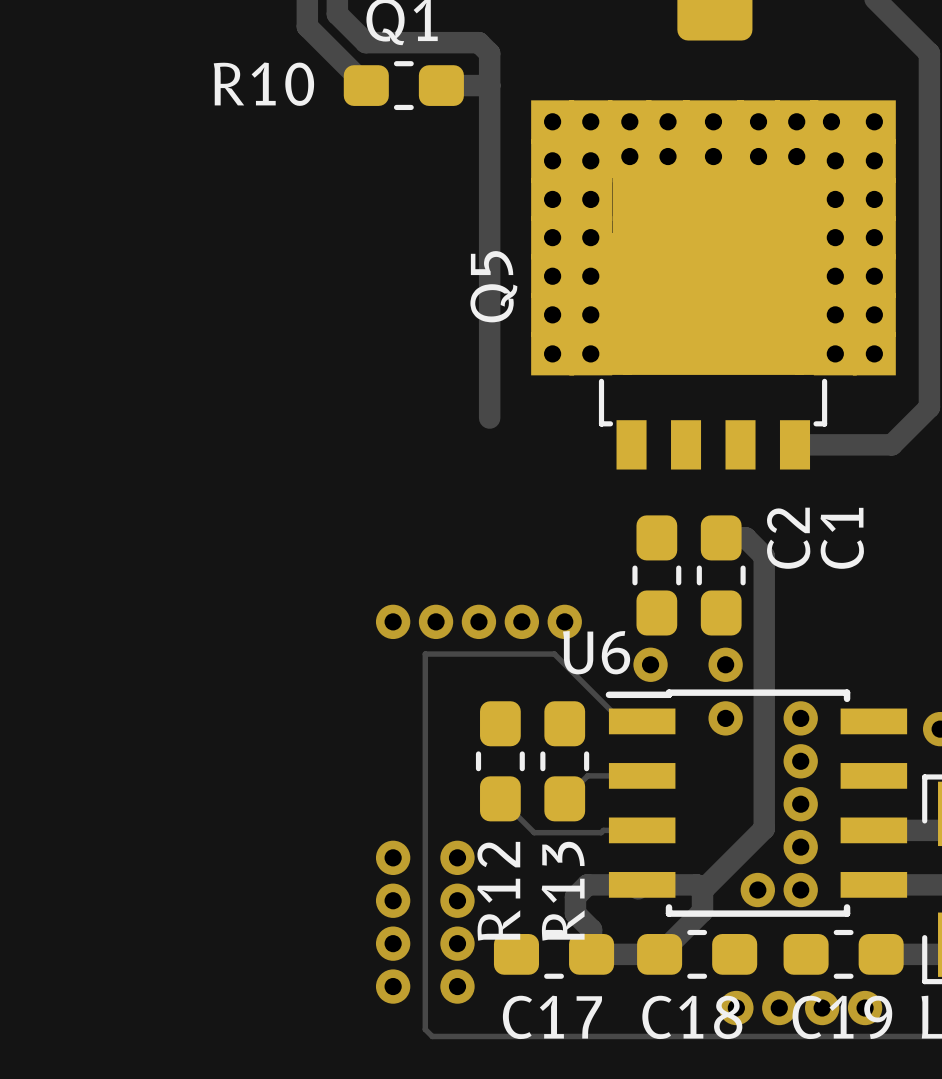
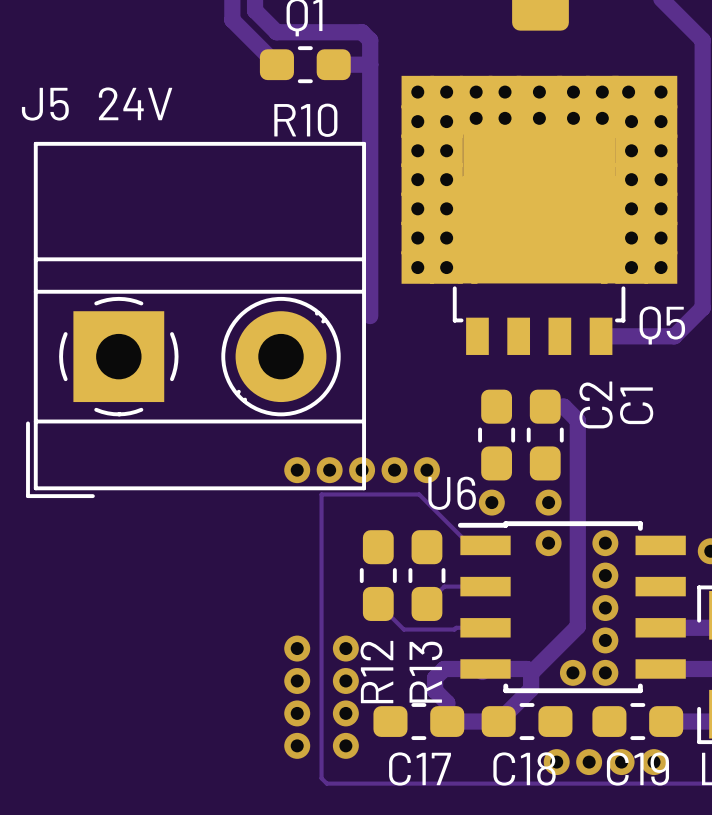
R10 name position: R10 (263, 84) -> R10 (305, 120)
text: none -> 24V (135, 103)
Q5 name rotation: 0° (493, 286) -> 90° clockwise (662, 325)
Q5 name position: Q5 (493, 286) -> Q5 (662, 325)
J5: none -> (196, 319)

